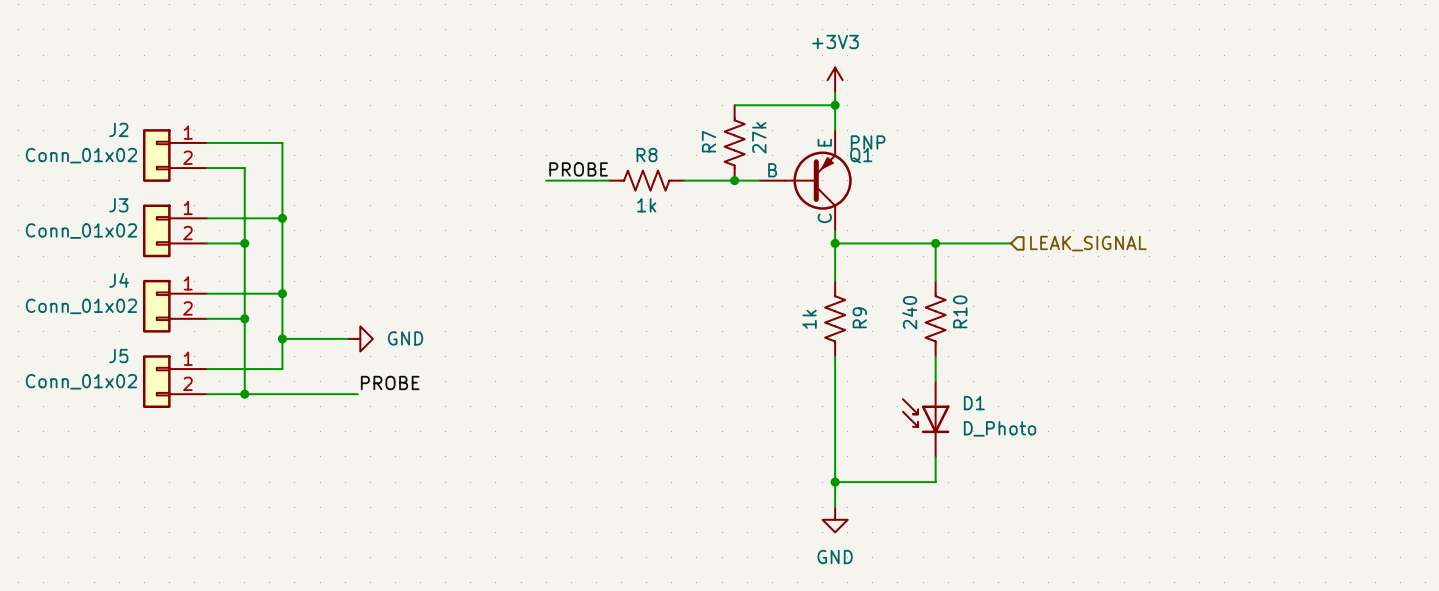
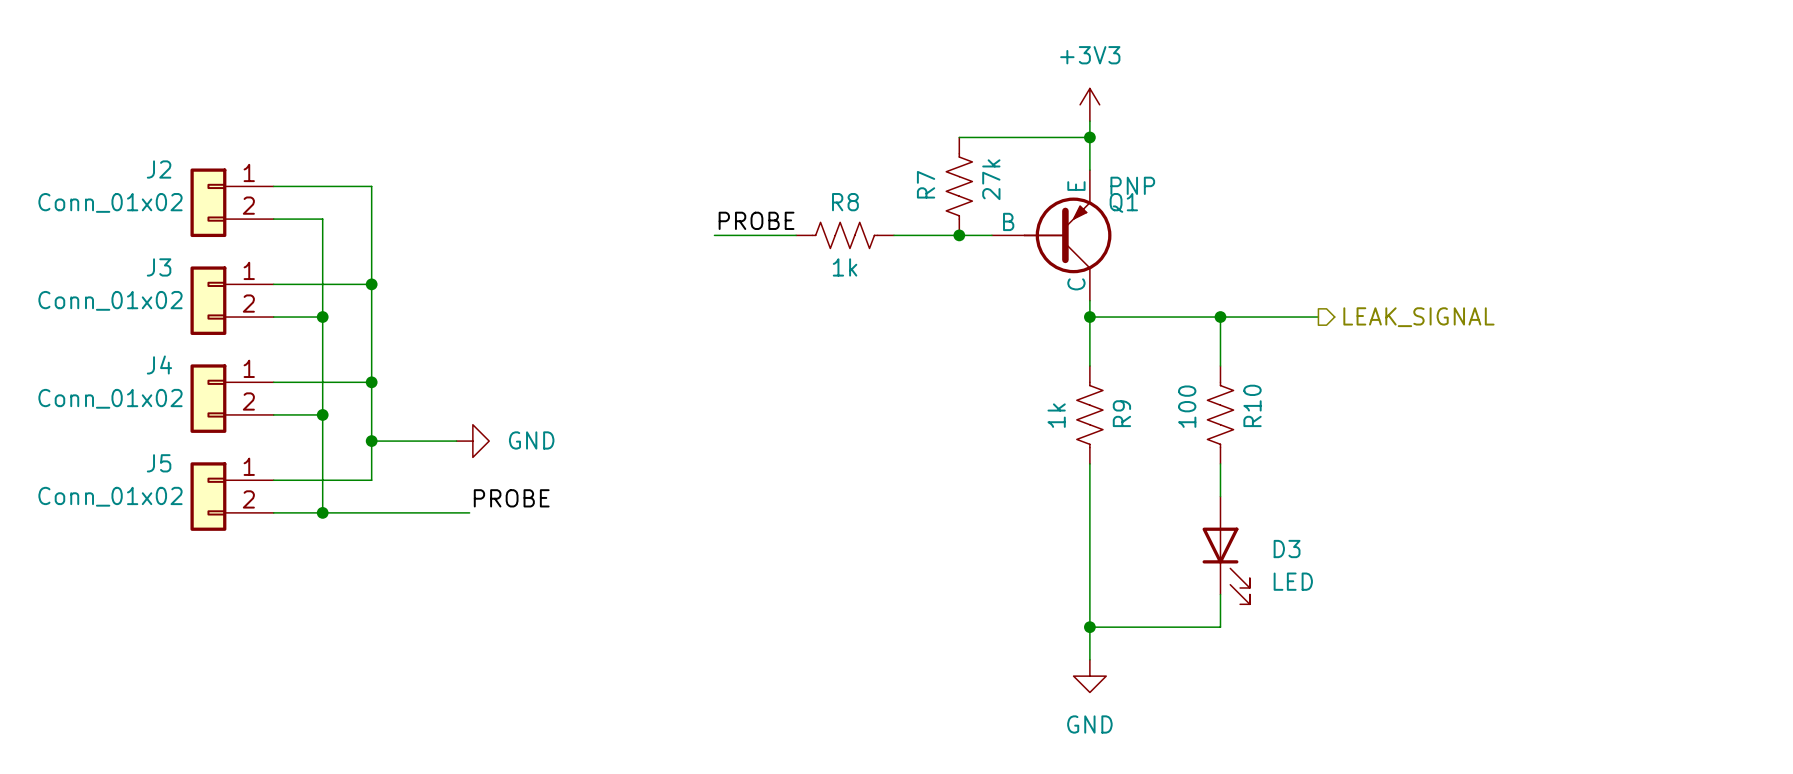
hierarchical label shape: input (1088, 243) -> output (1418, 317)
R10 value: 240 (909, 312) -> 100 (1187, 406)
D1: D_Photo (926, 419) -> none
D3: none -> LED (1226, 550)

